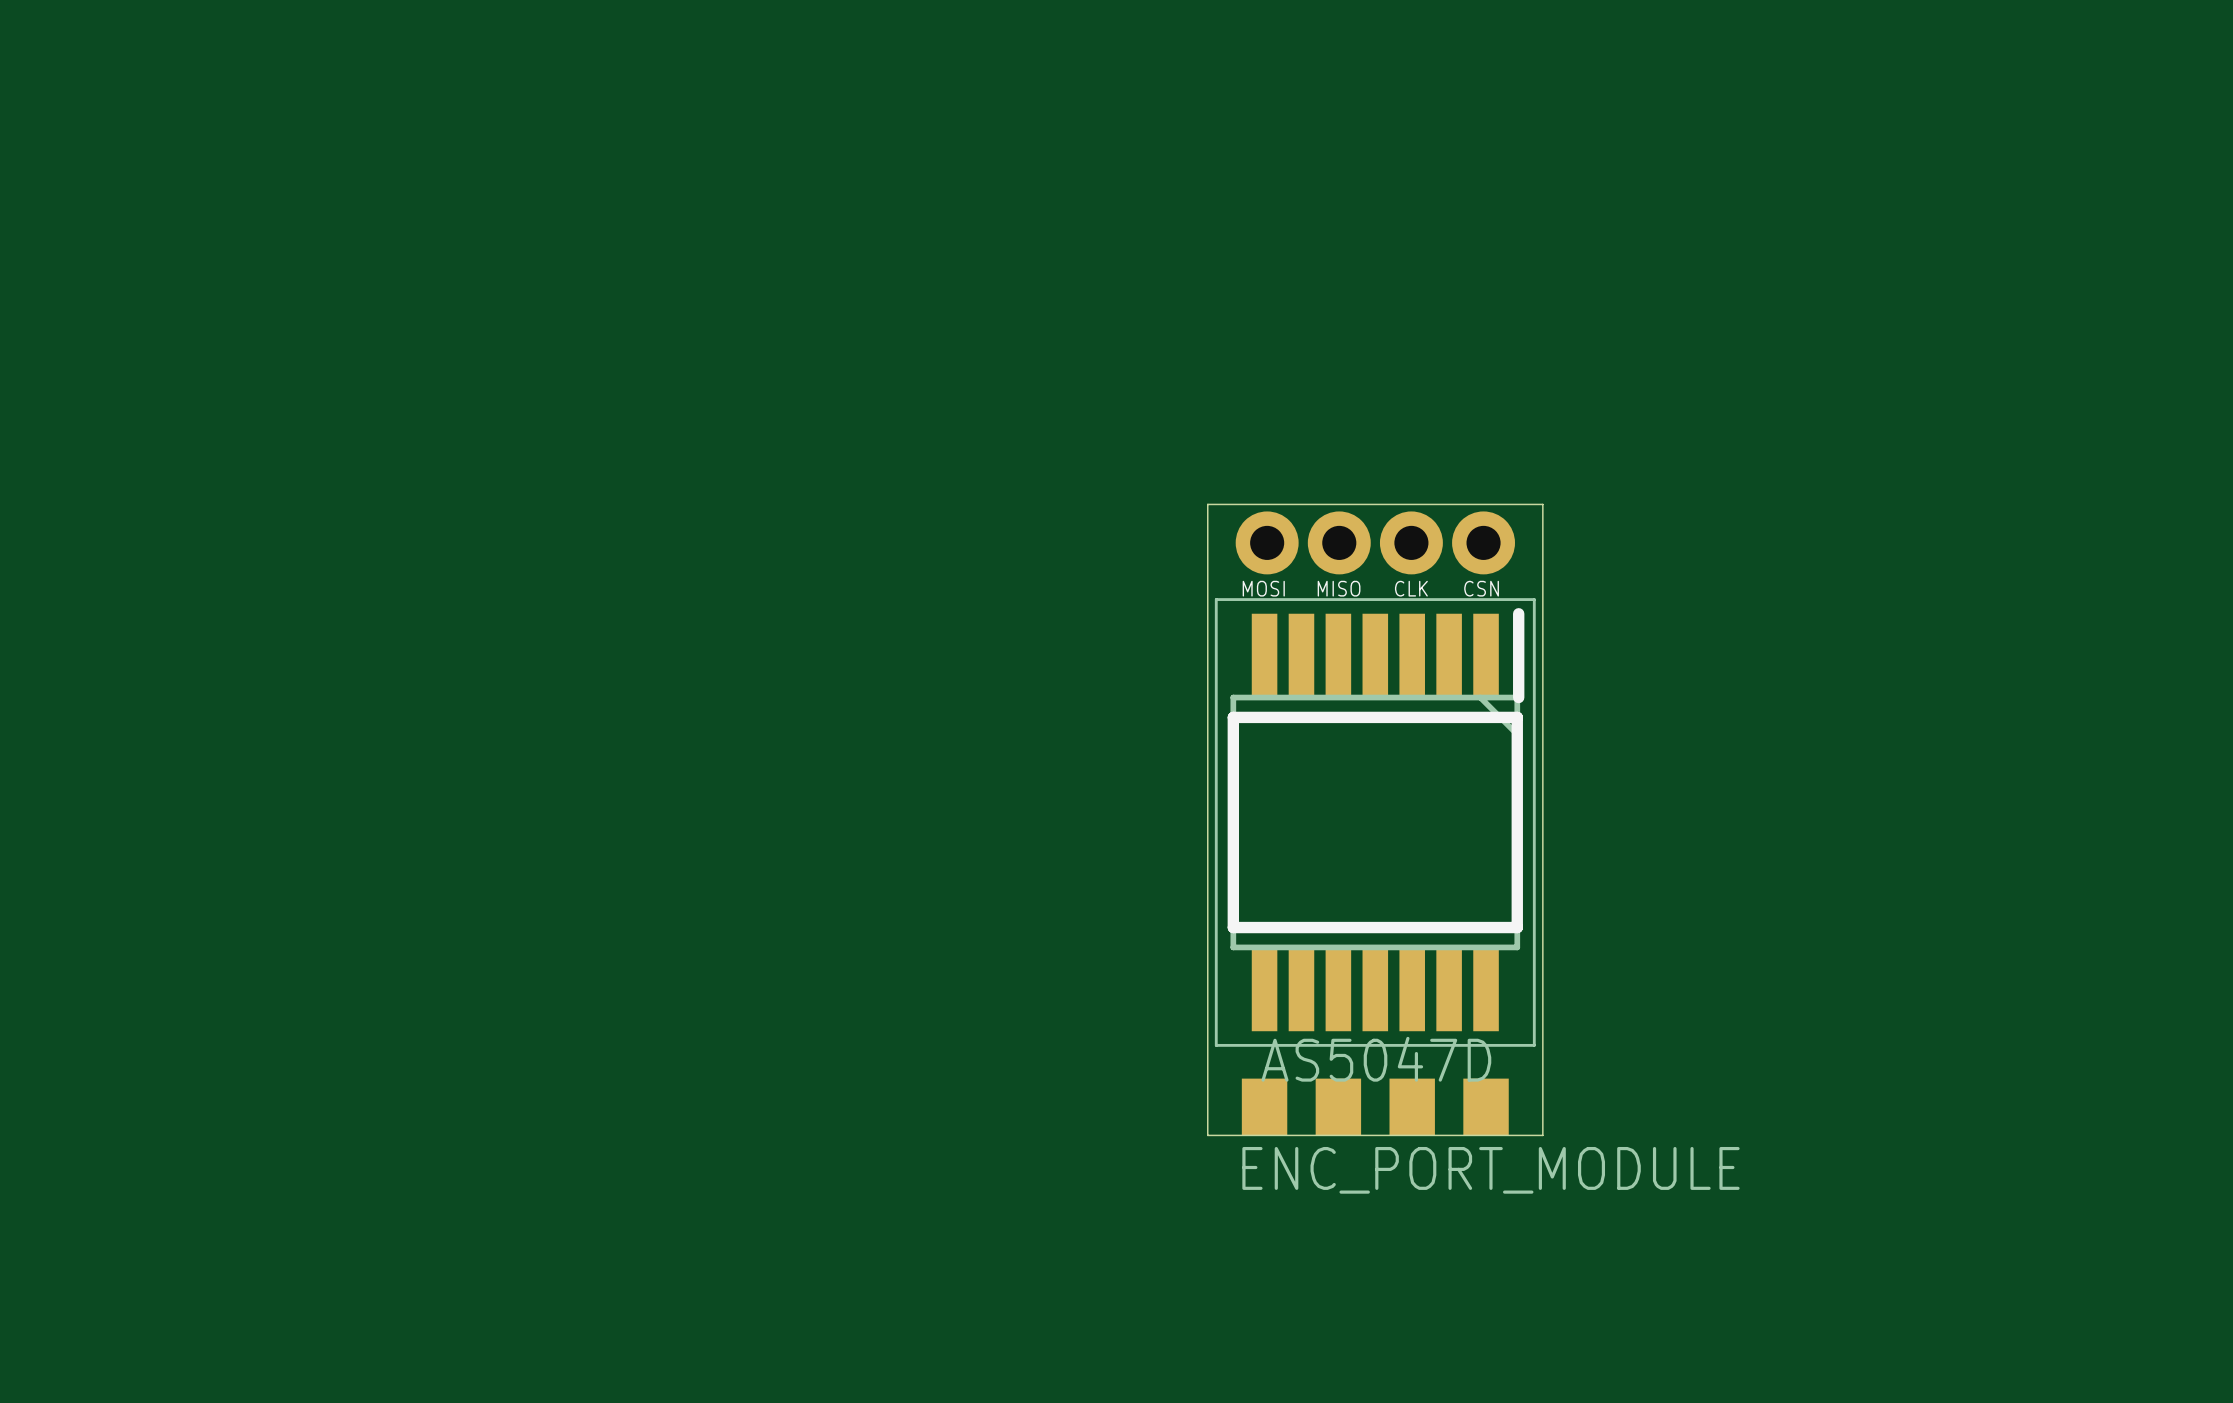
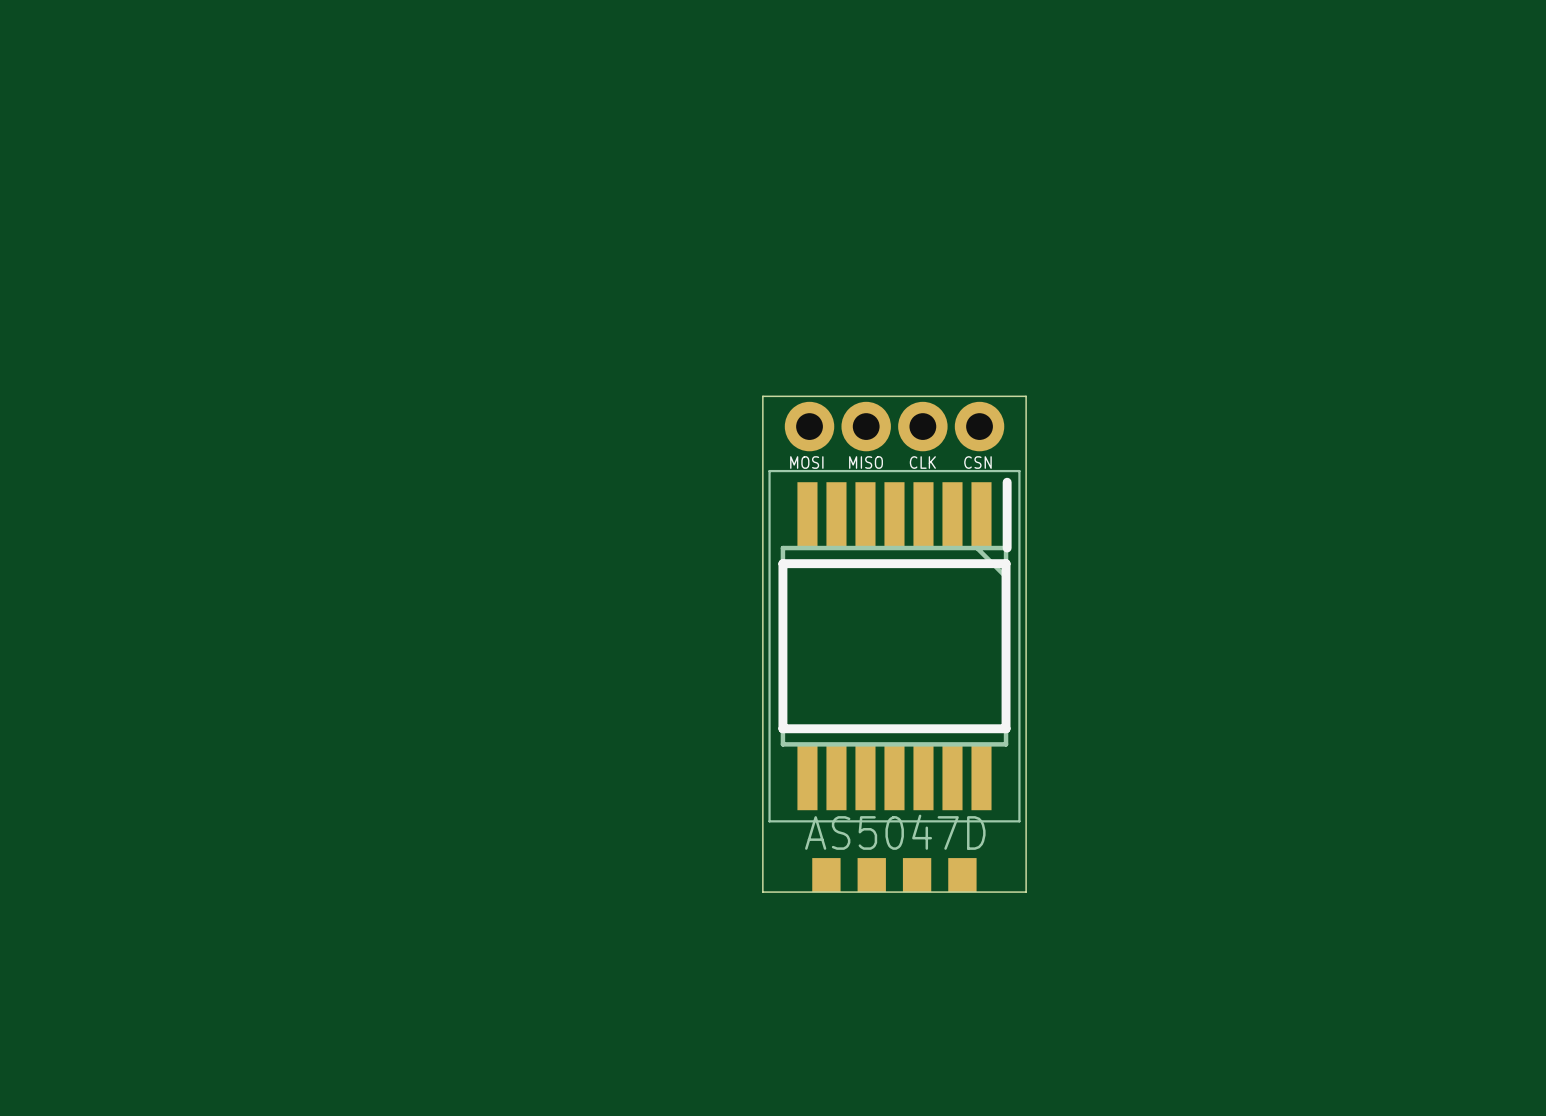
part footprint: [1241, 1078, 1509, 1136] -> [812, 858, 977, 893]
part value: ENC_PORT_MODULE (1490, 1170) -> none

